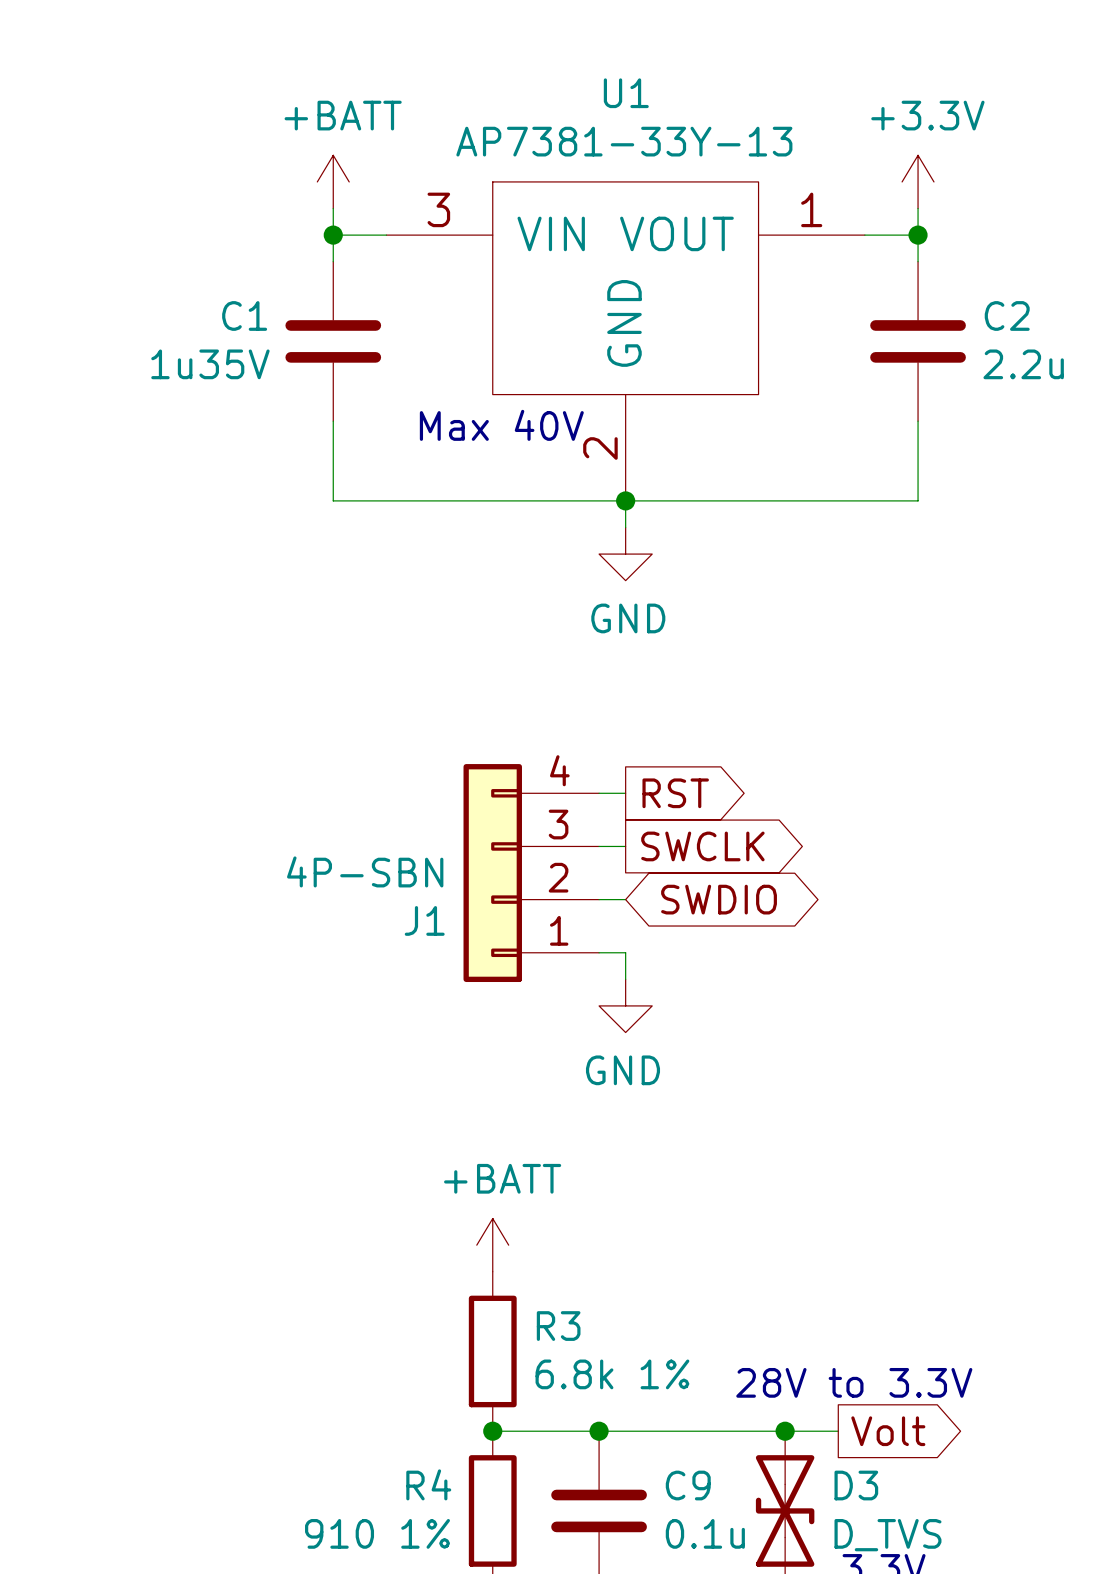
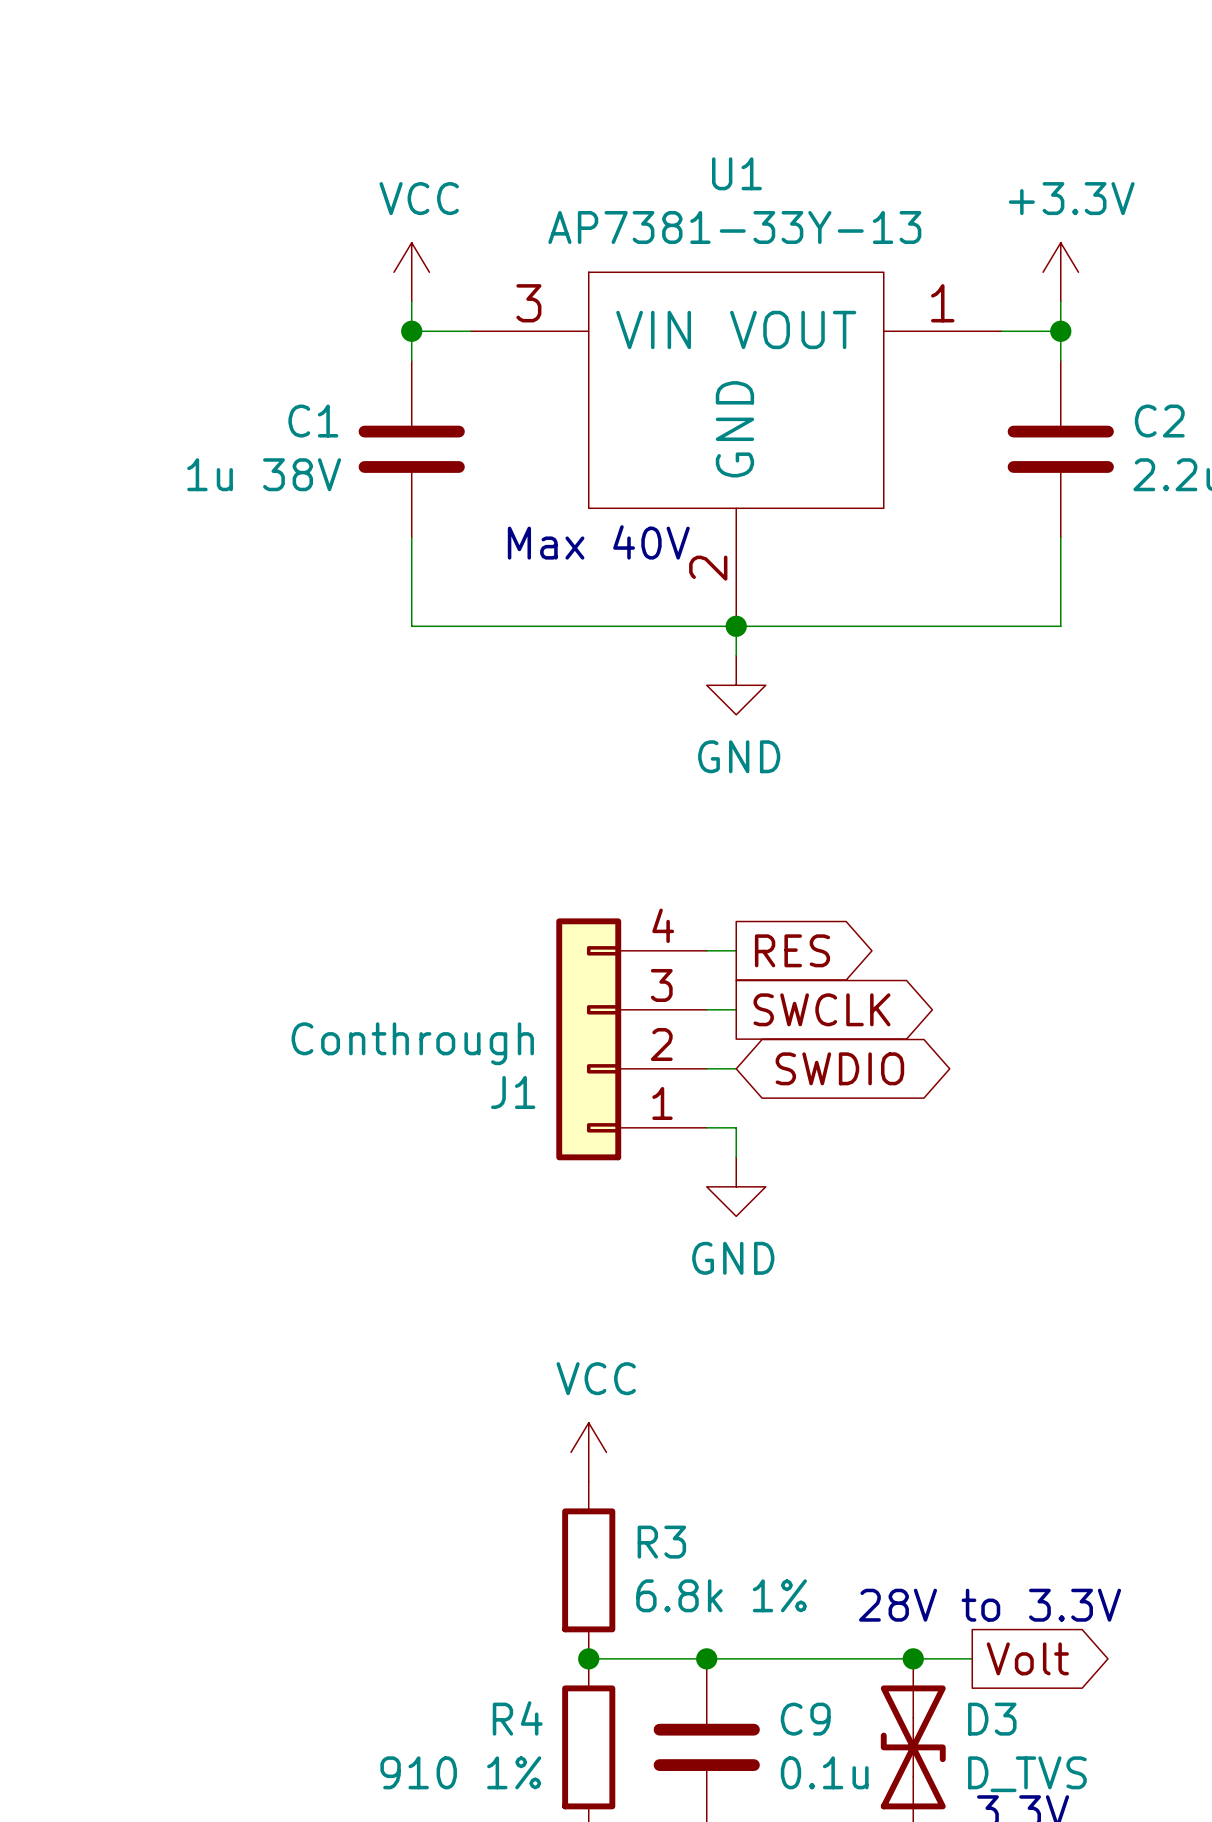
power symbol: +BATT (333, 181) -> VCC (411, 272)
C1 value: 1u35V (210, 364) -> 1u 38V (264, 474)
global label: RST (675, 793) -> RES (792, 950)
J1 value: 4P-SBN (365, 871) -> Conthrough (412, 1043)
power symbol: +BATT (492, 1245) -> VCC (588, 1452)

